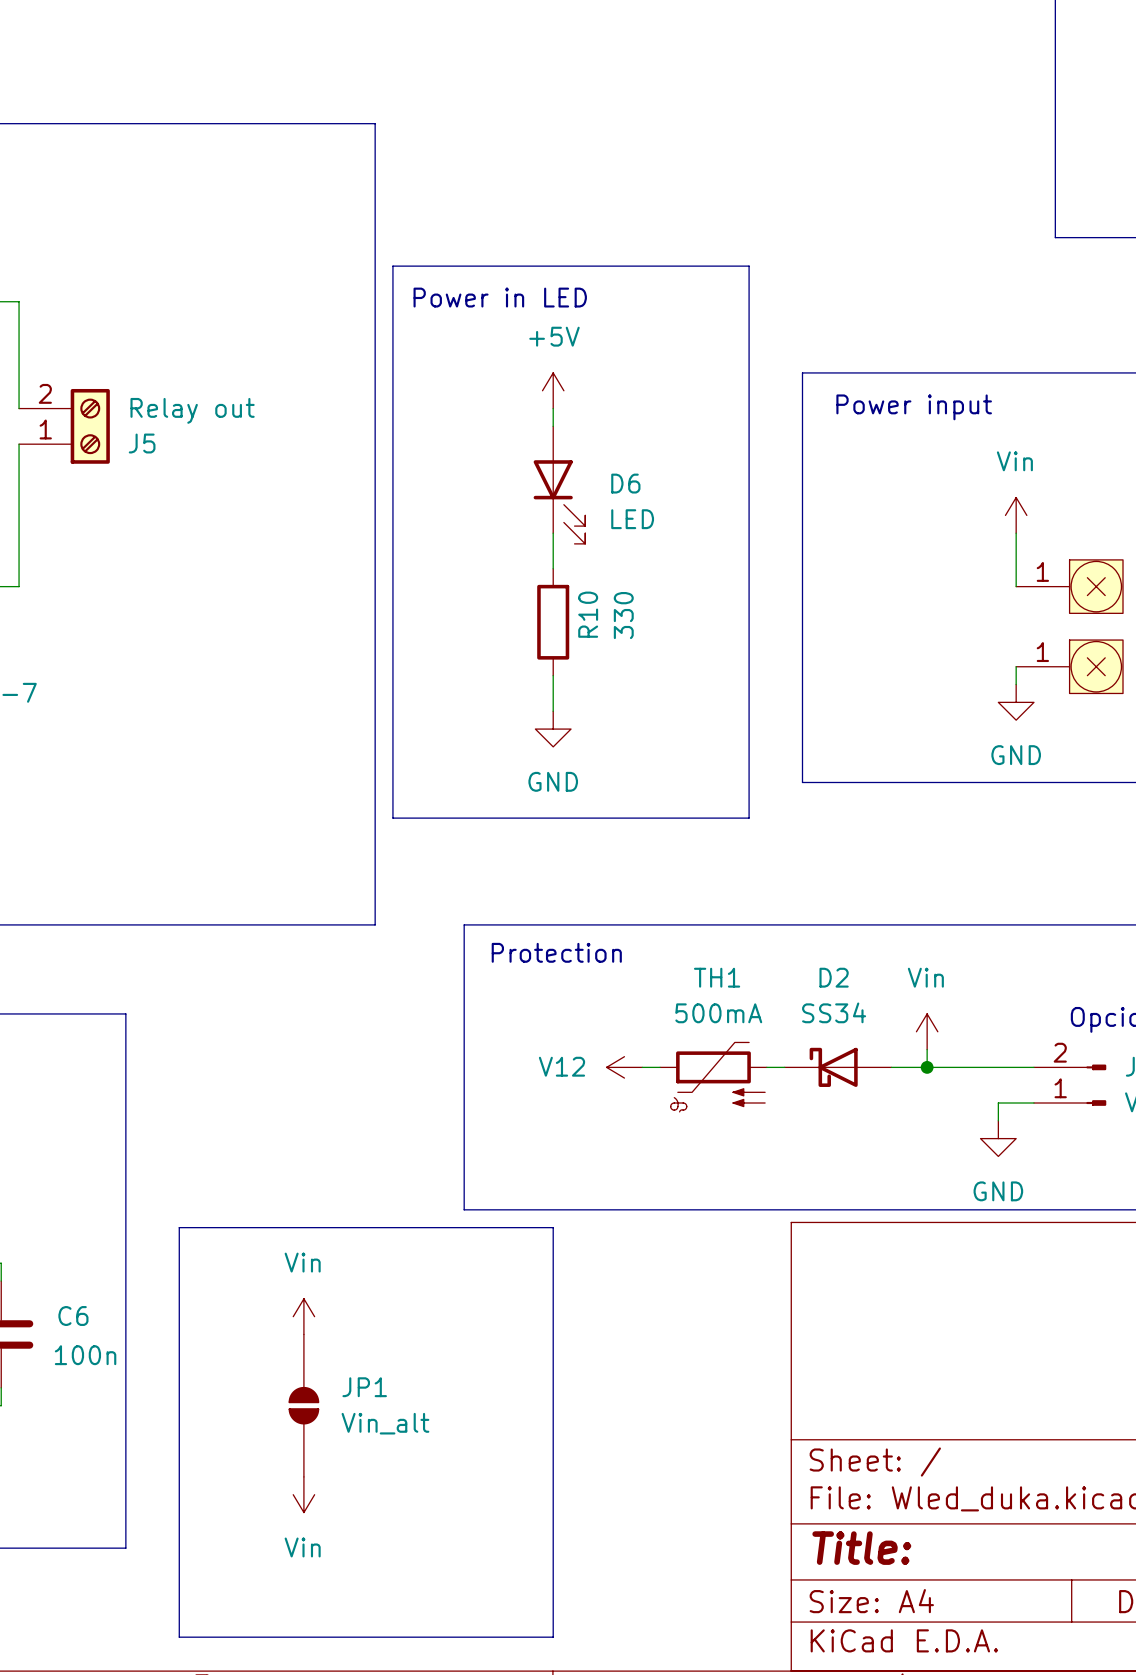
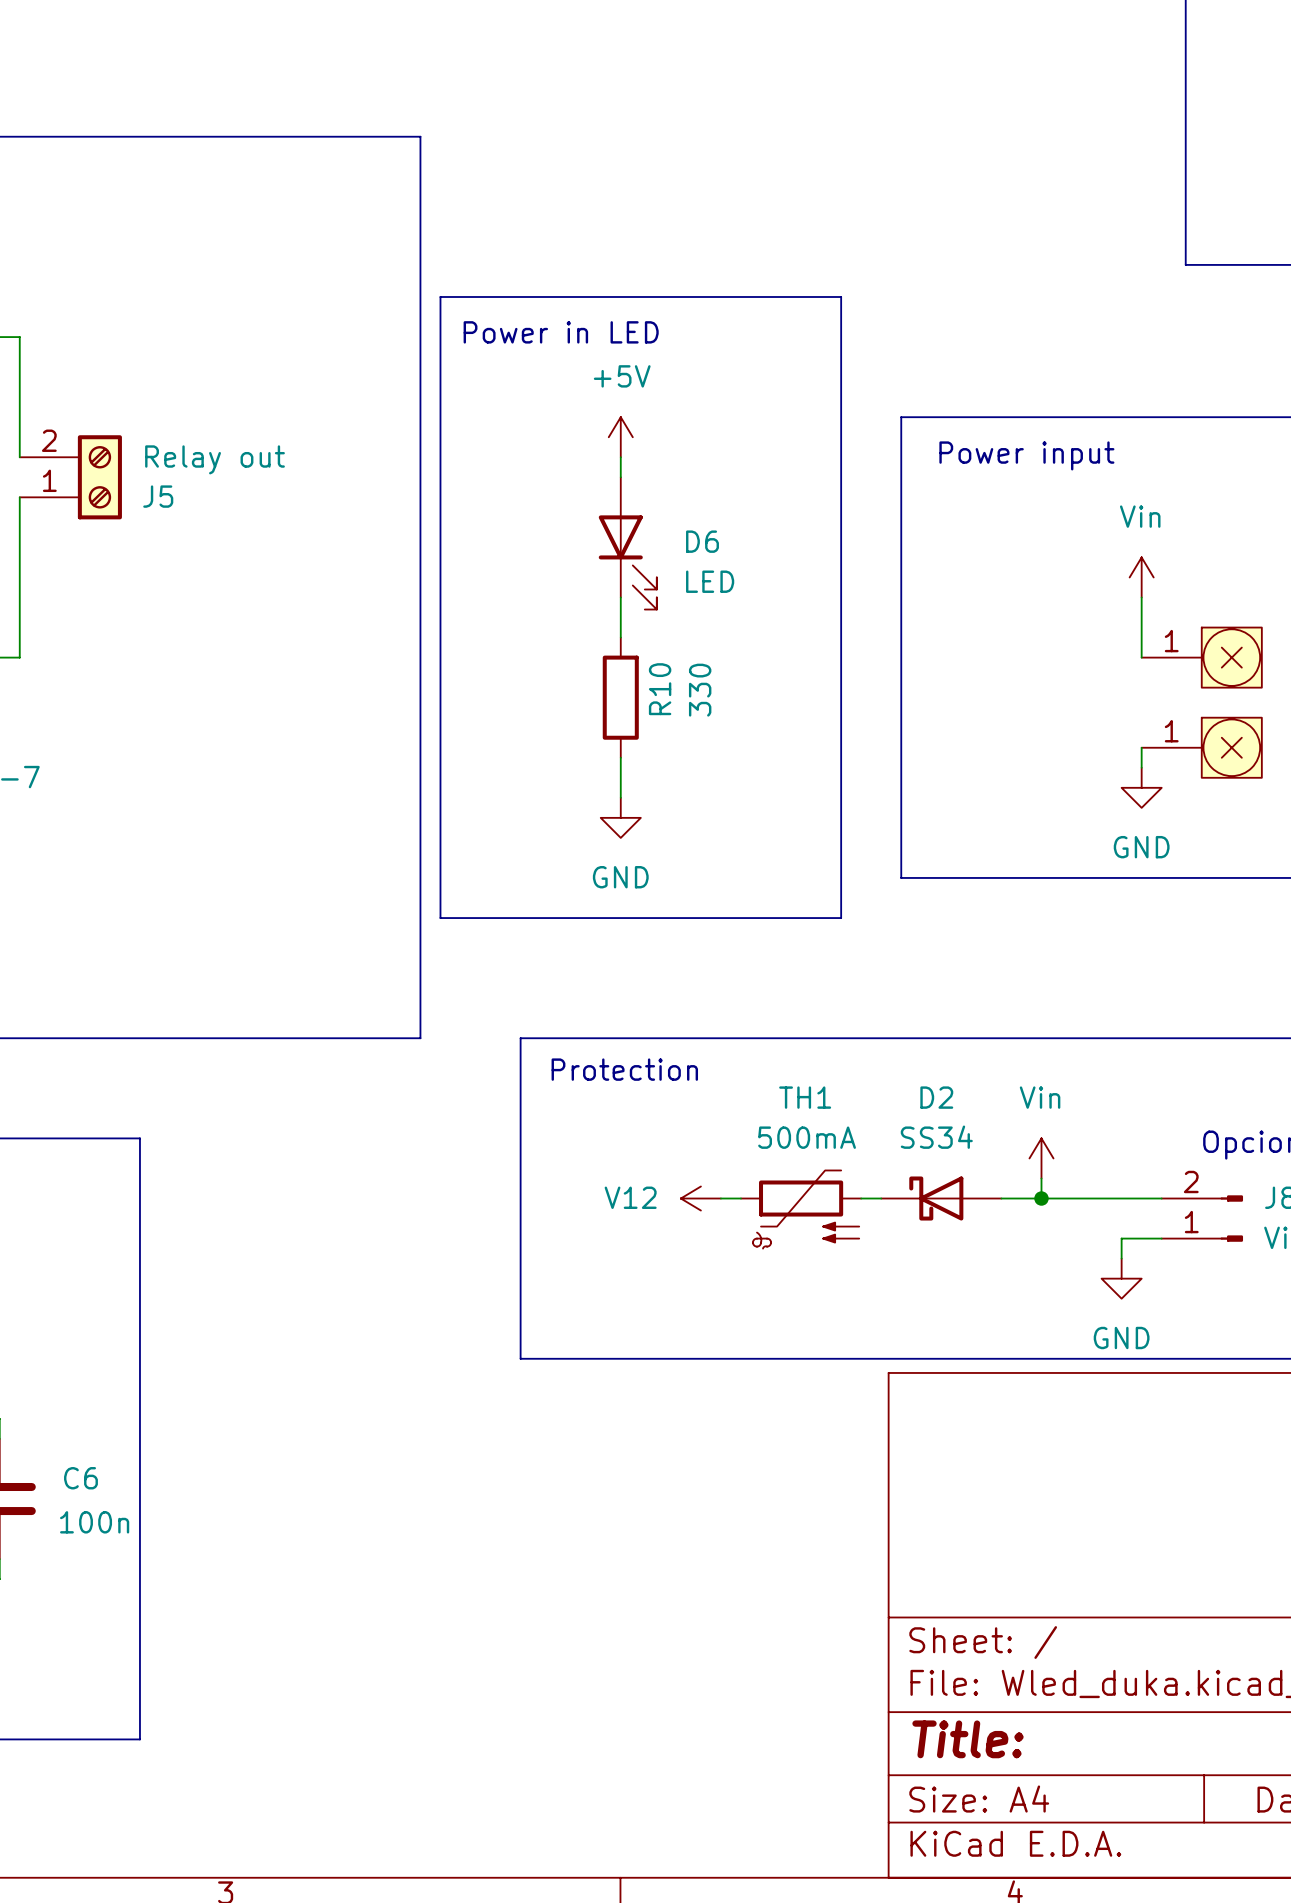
line: (179, 1227) (553, 1227) (553, 1637) (179, 1637) (179, 1227) -> none
power symbol: Vin (303, 1316) -> none
JP1: Vin_alt (303, 1405) -> none
power symbol: Vin (303, 1494) -> none

